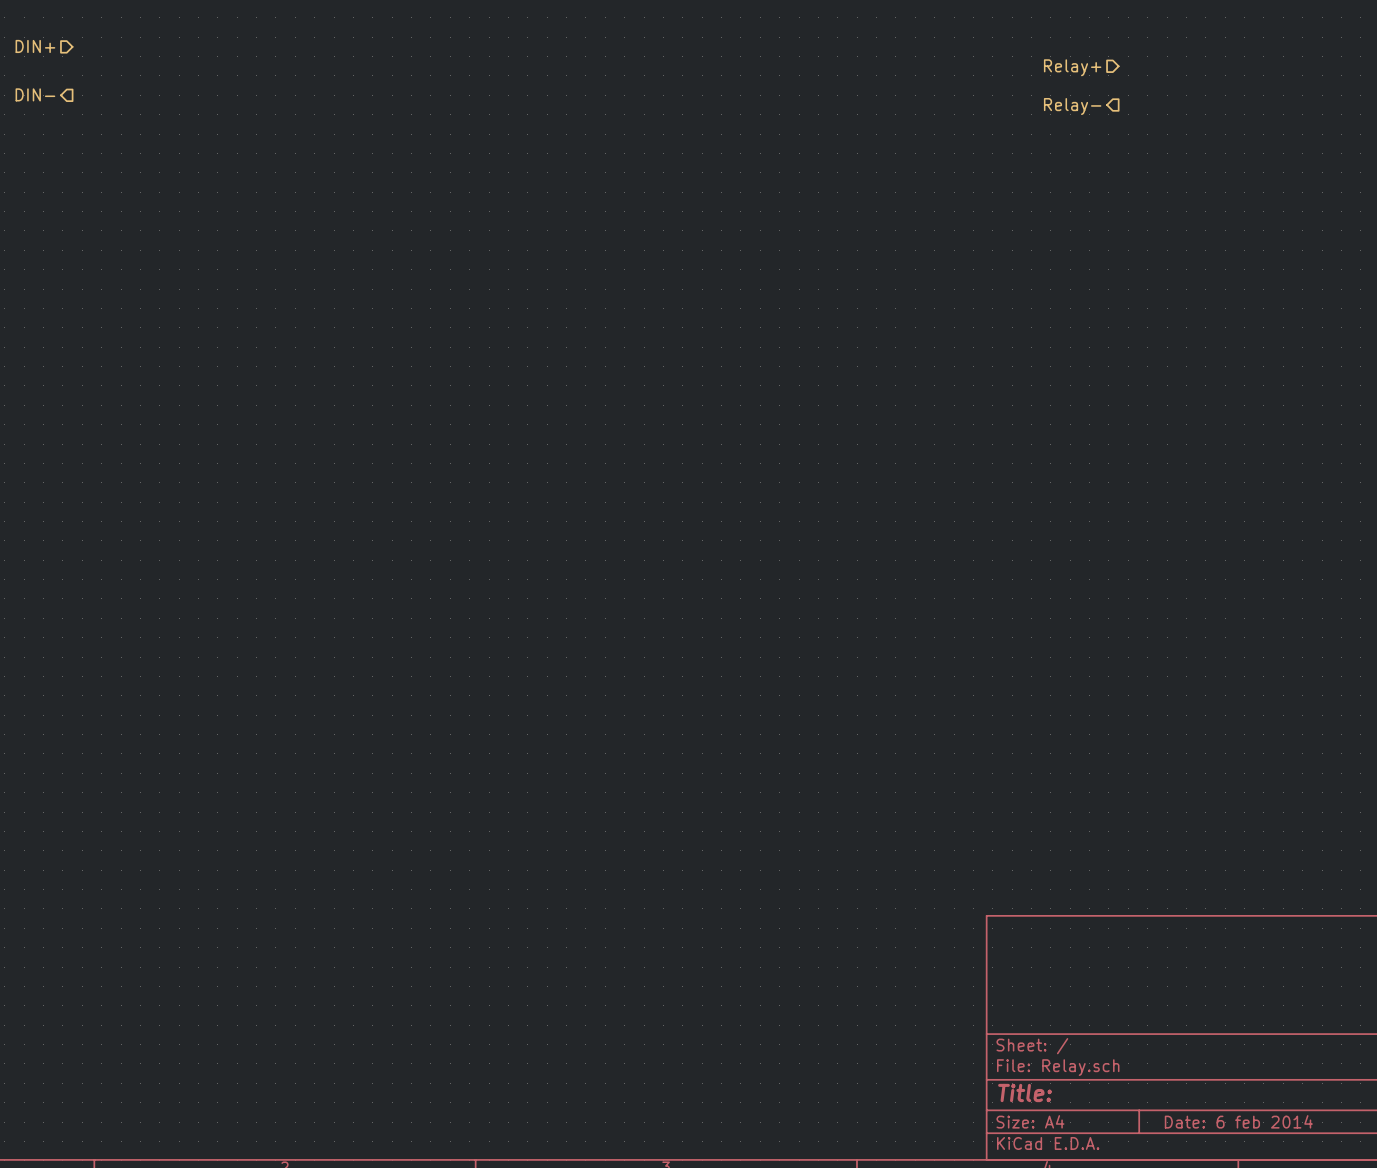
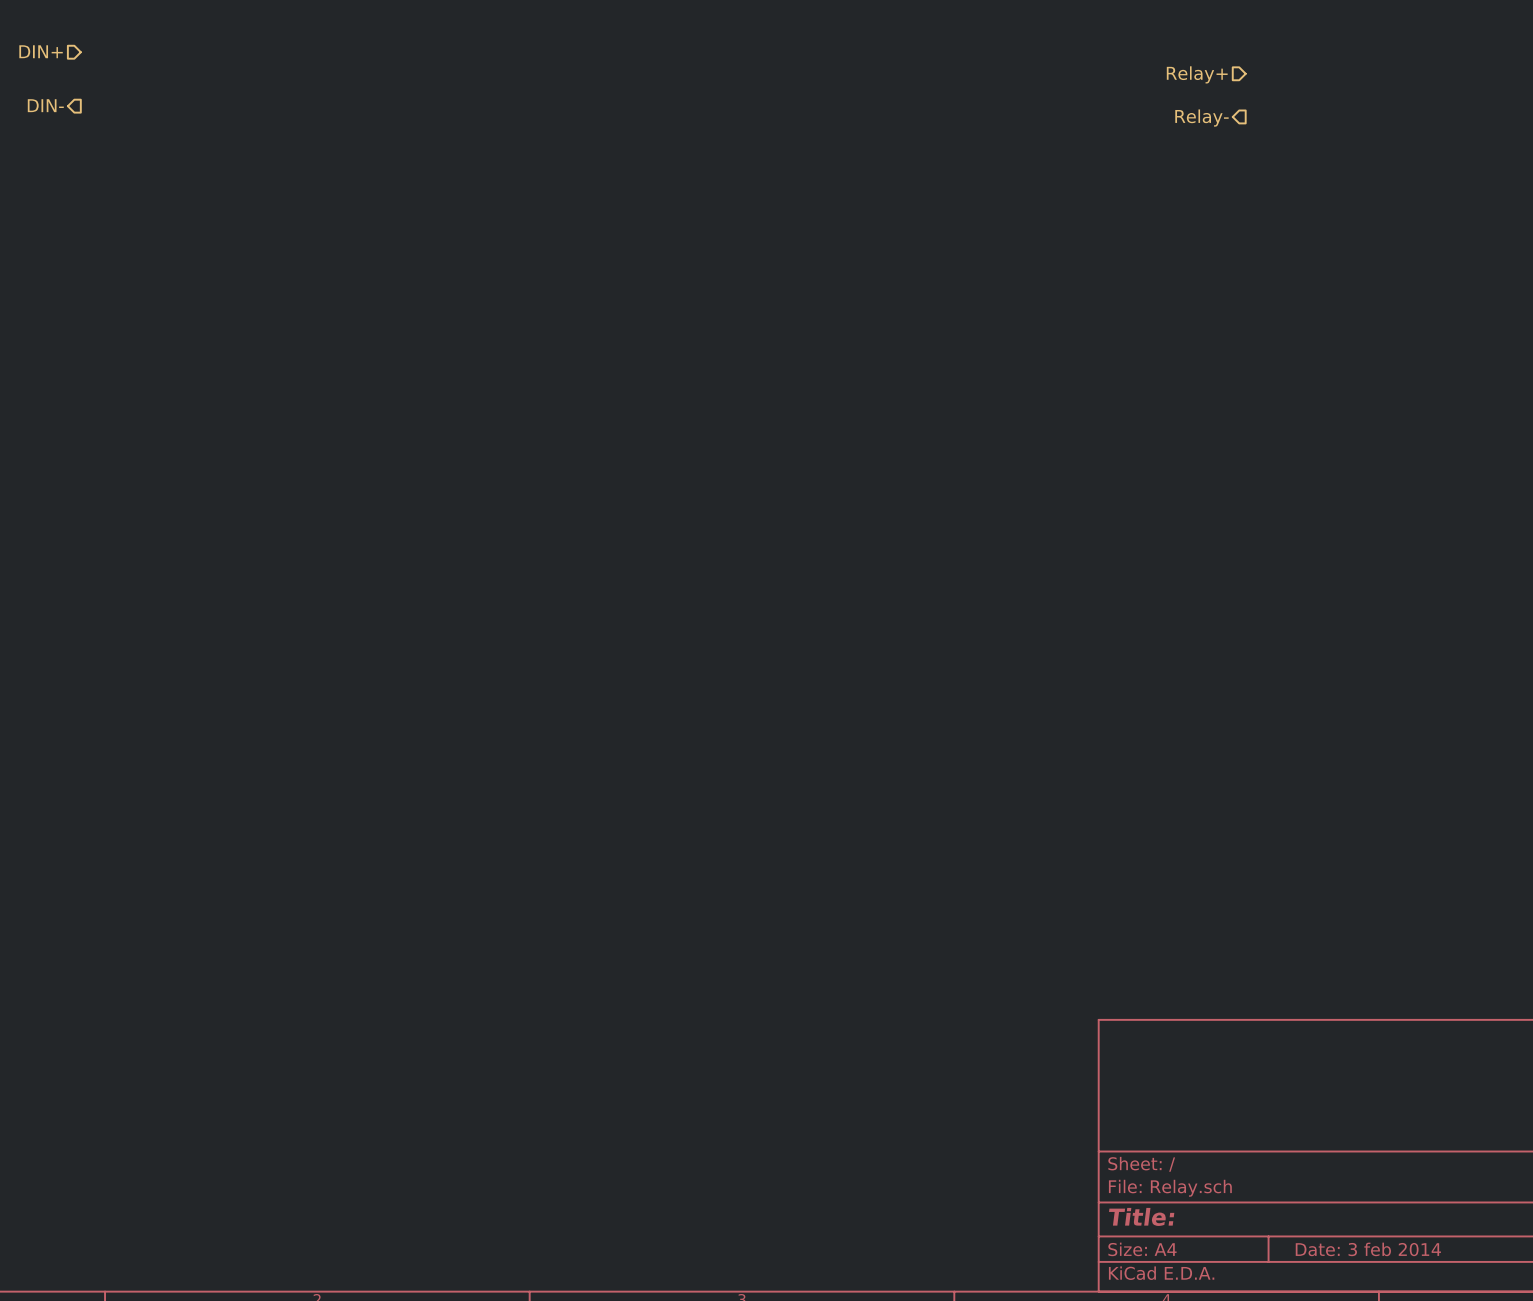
title block: Date: 6 feb 2014 (1238, 1121) -> Date: 3 feb 2014 (1368, 1249)

